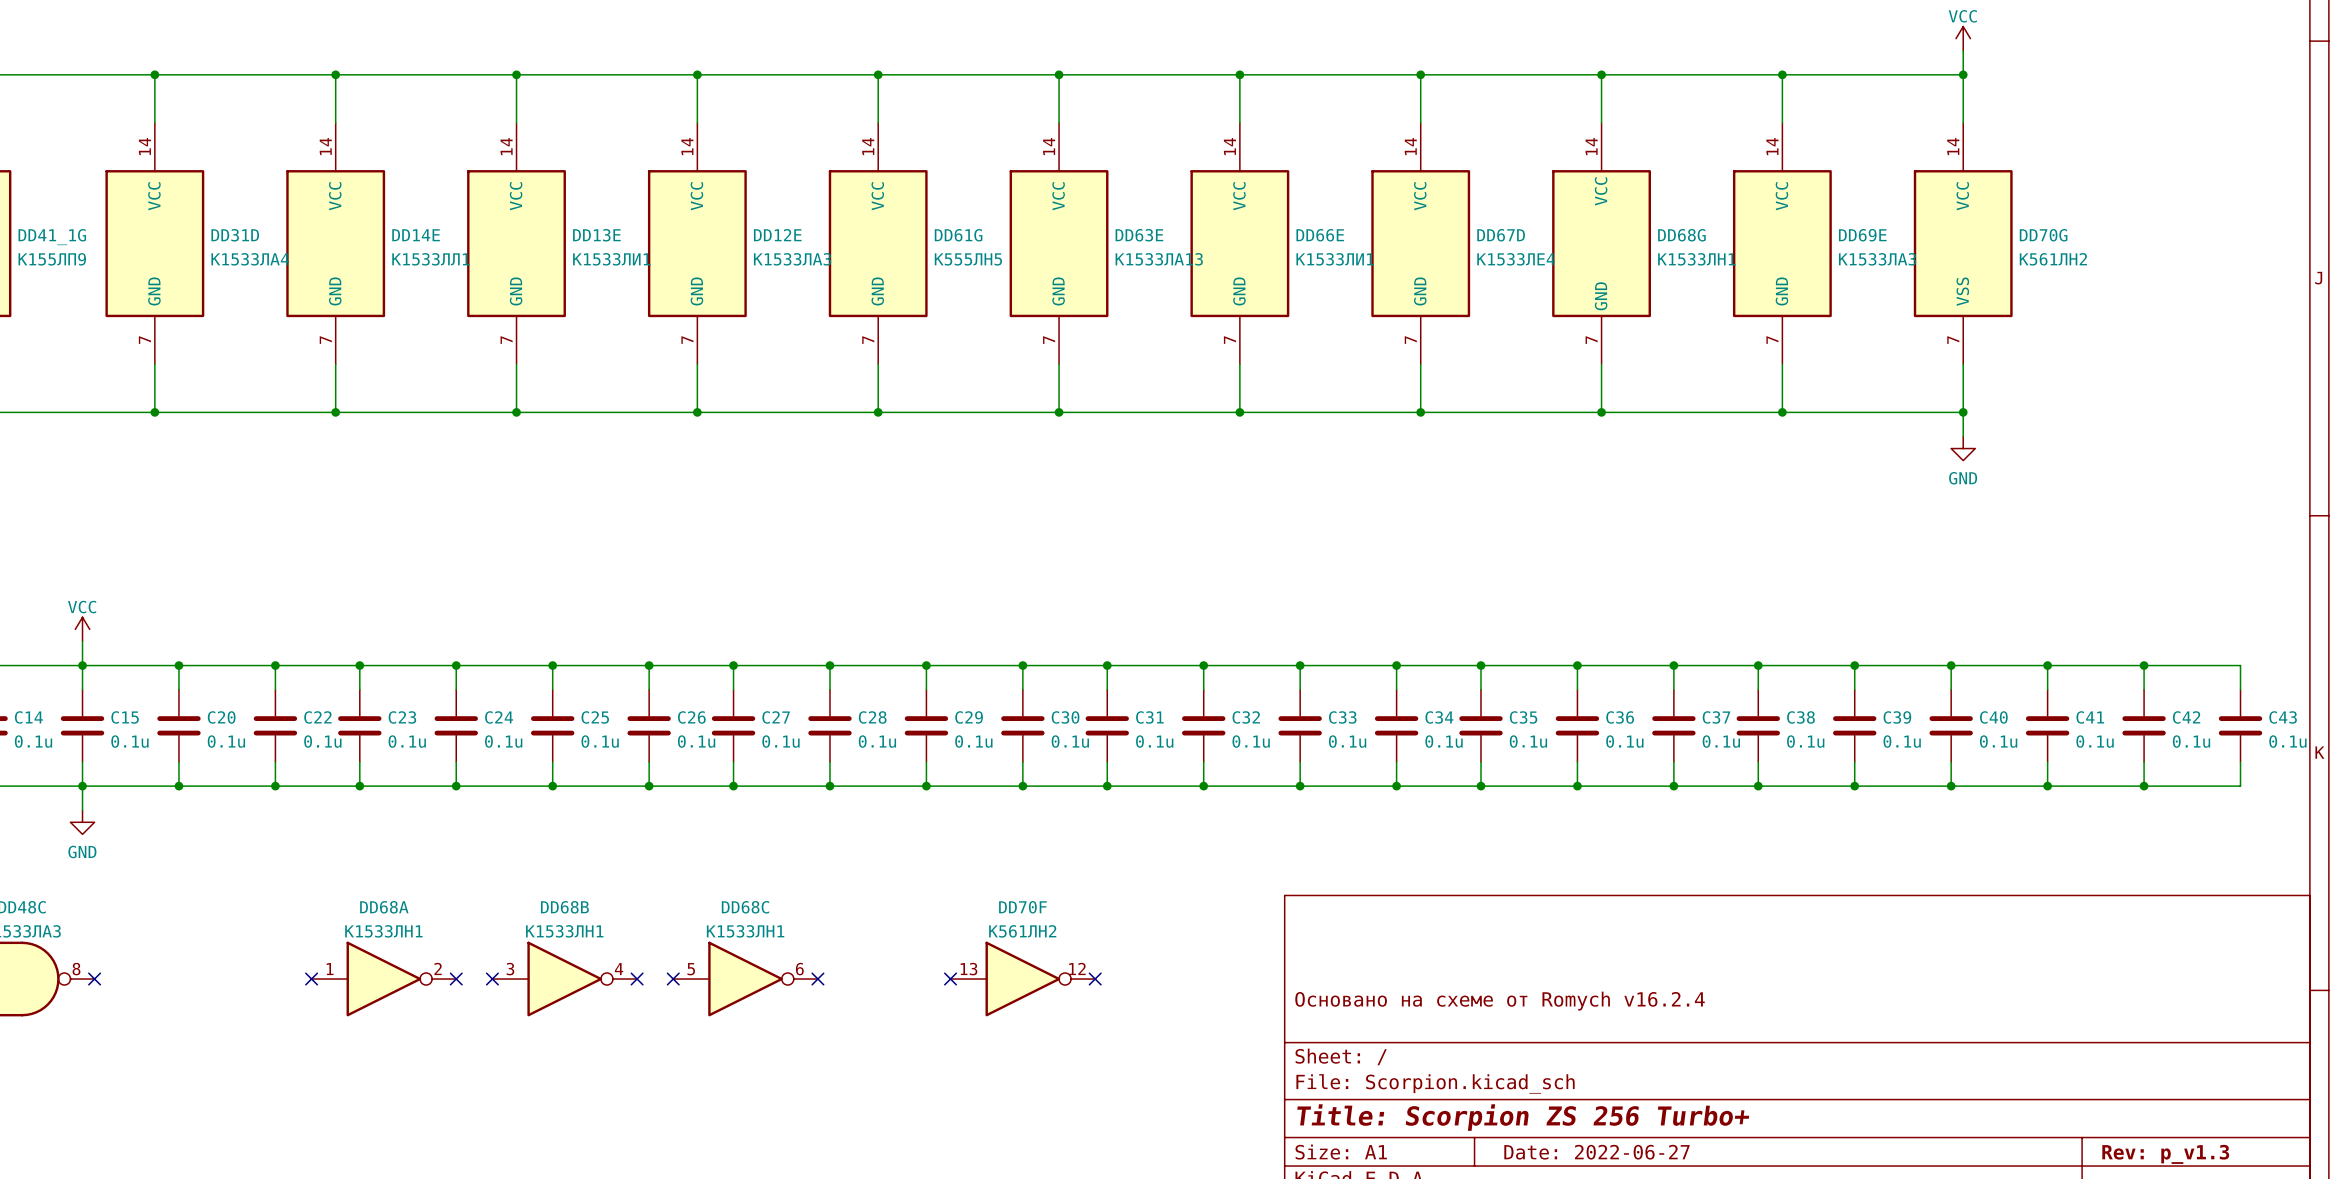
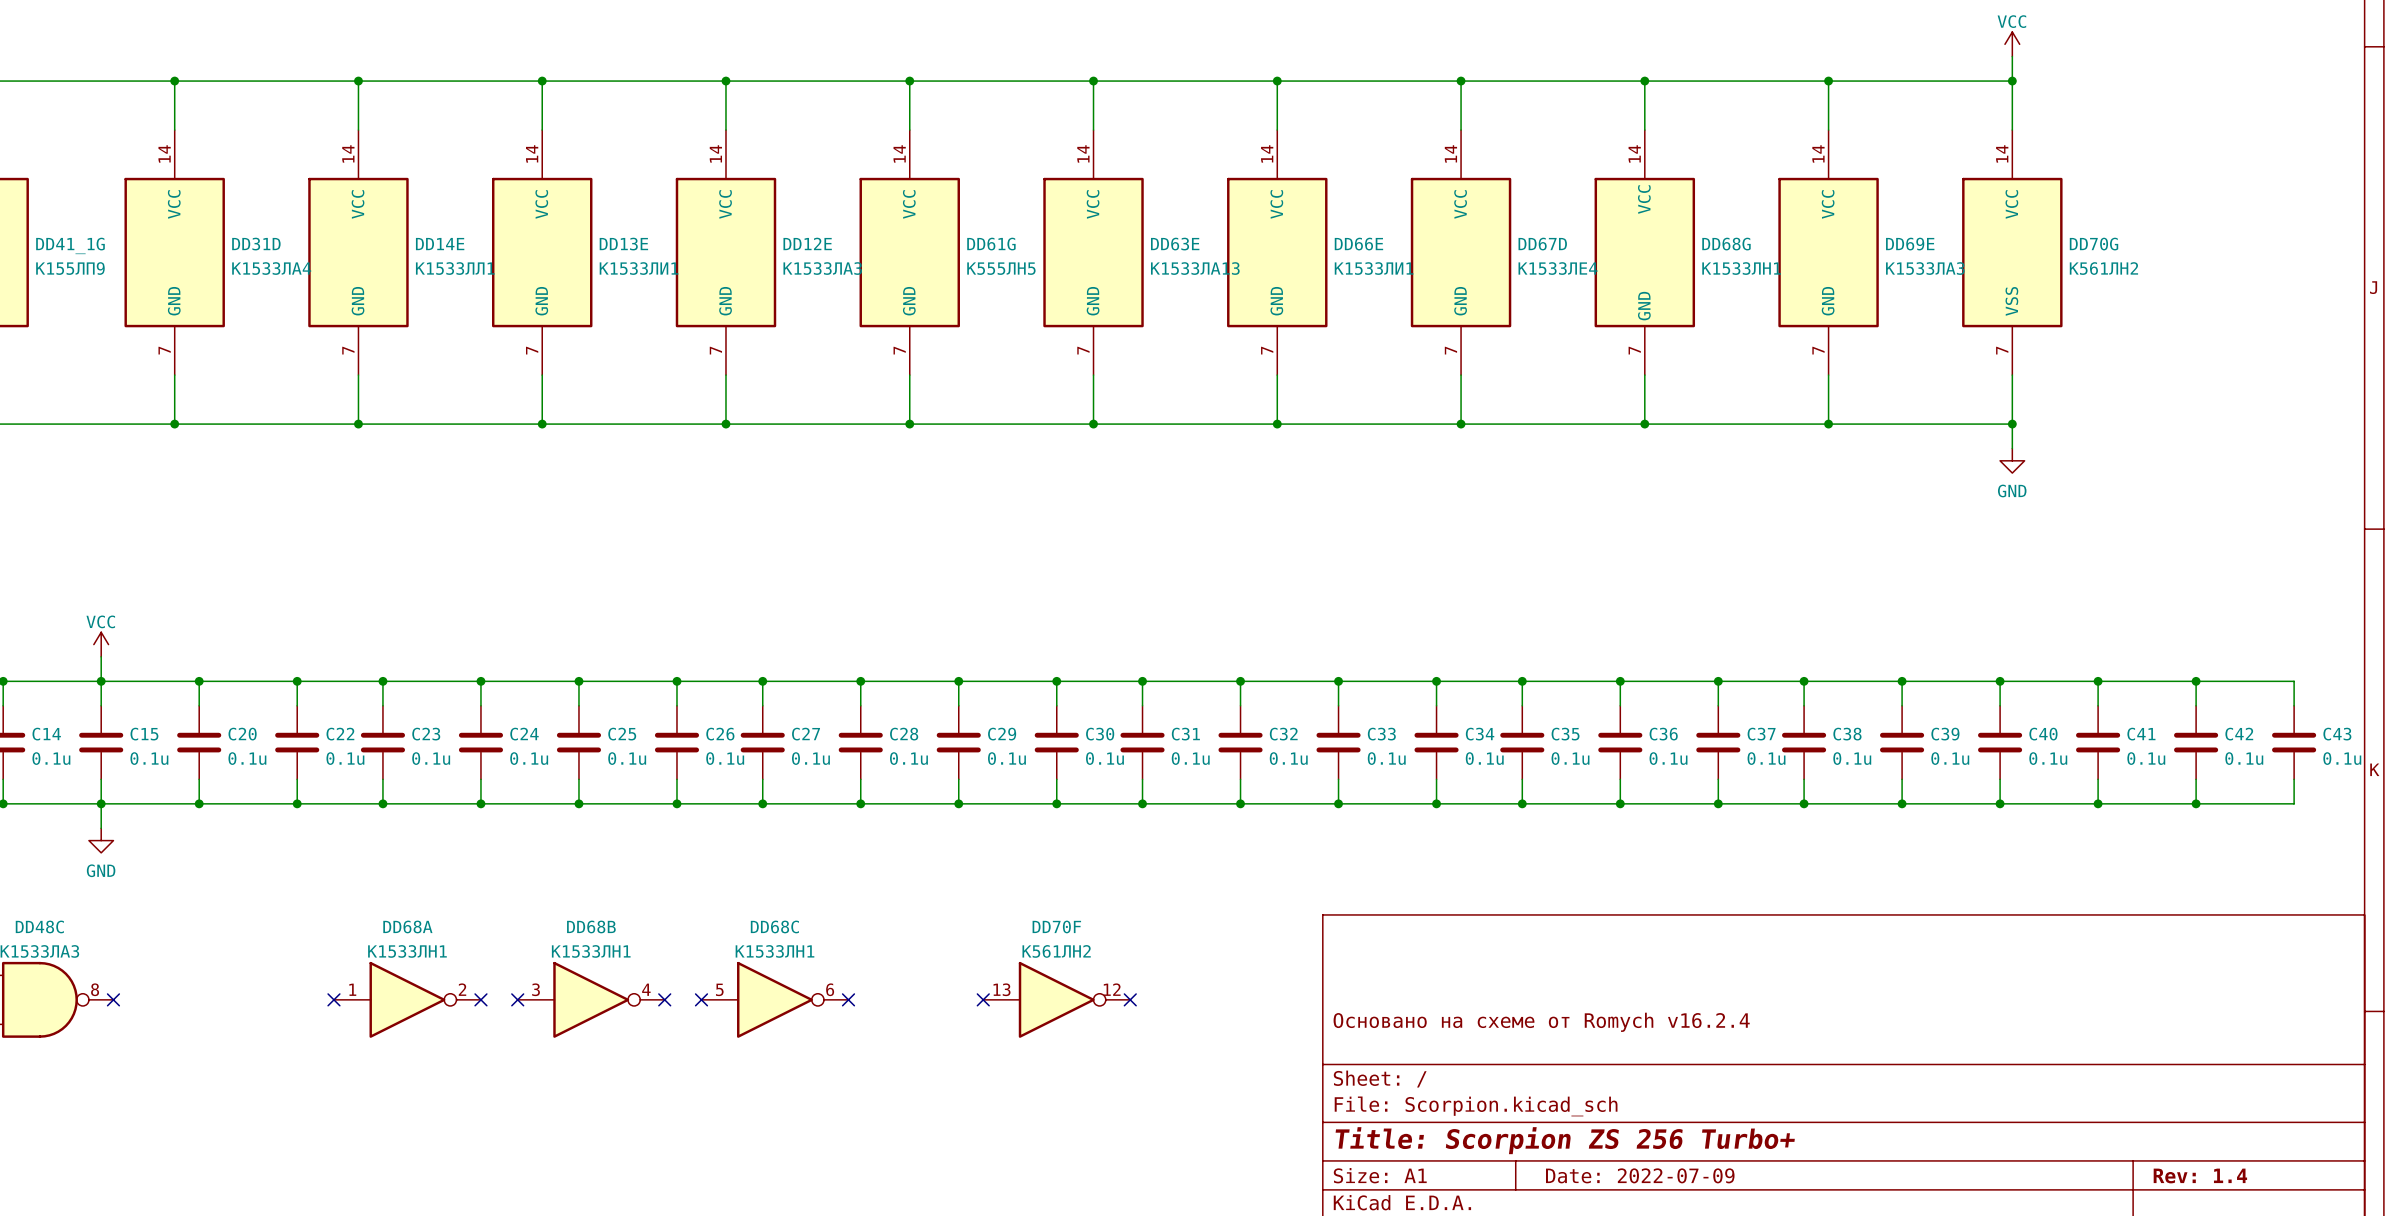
title block: Date: 2022-06-27 (1597, 1152) -> Date: 2022-07-09 (1640, 1175)
title block: Rev: p_v1.3 (2165, 1154) -> Rev: 1.4 (2200, 1175)

